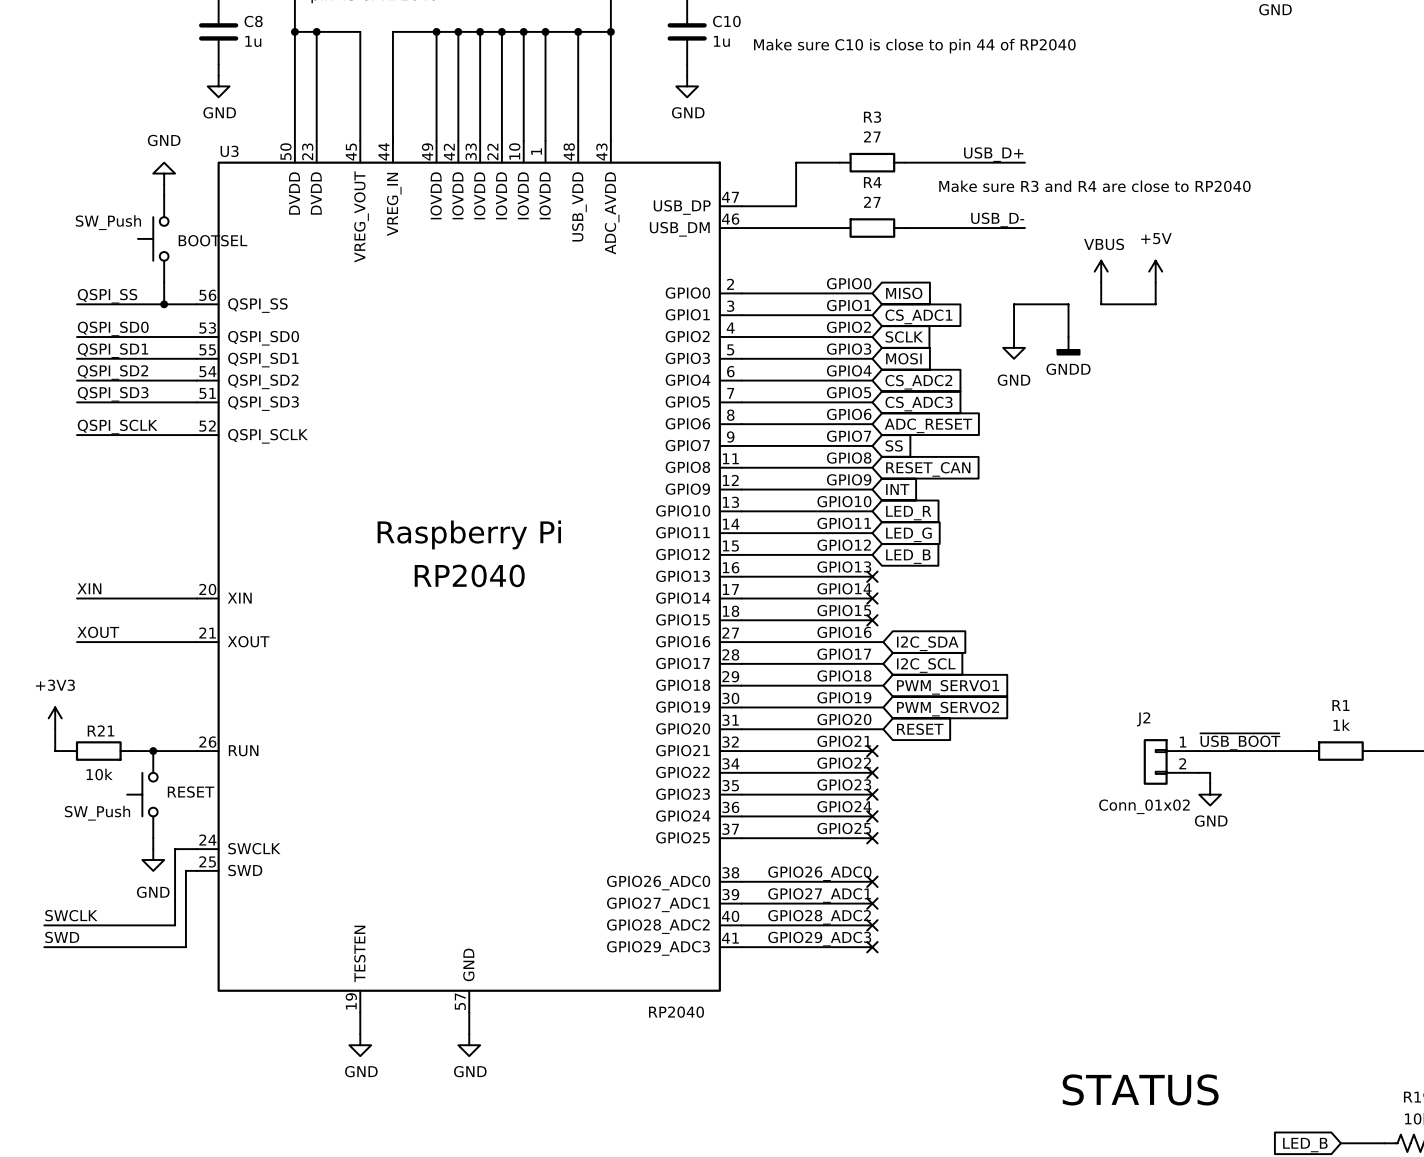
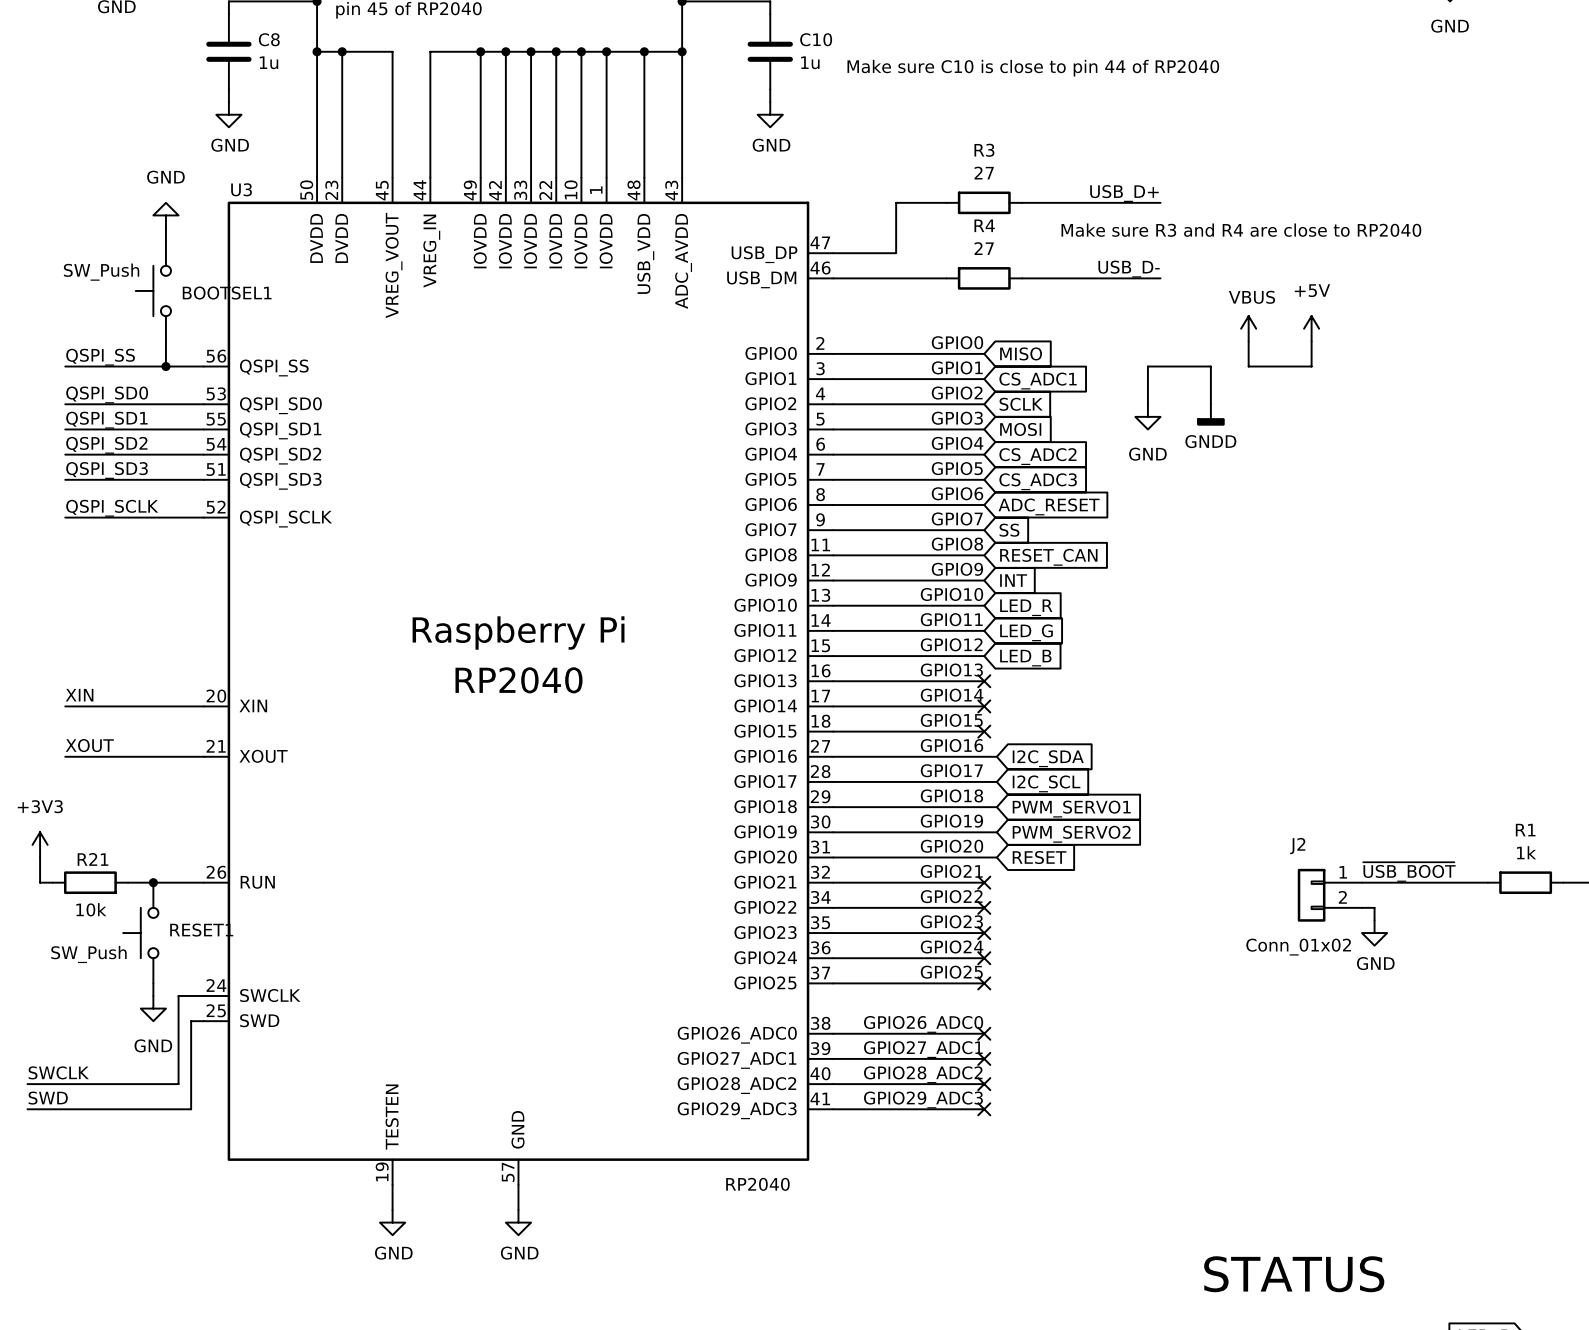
BOOTSEL name: BOOTSEL (213, 240) -> BOOTSEL1 (227, 293)
RESET name: RESET (191, 792) -> RESET1 (201, 930)

